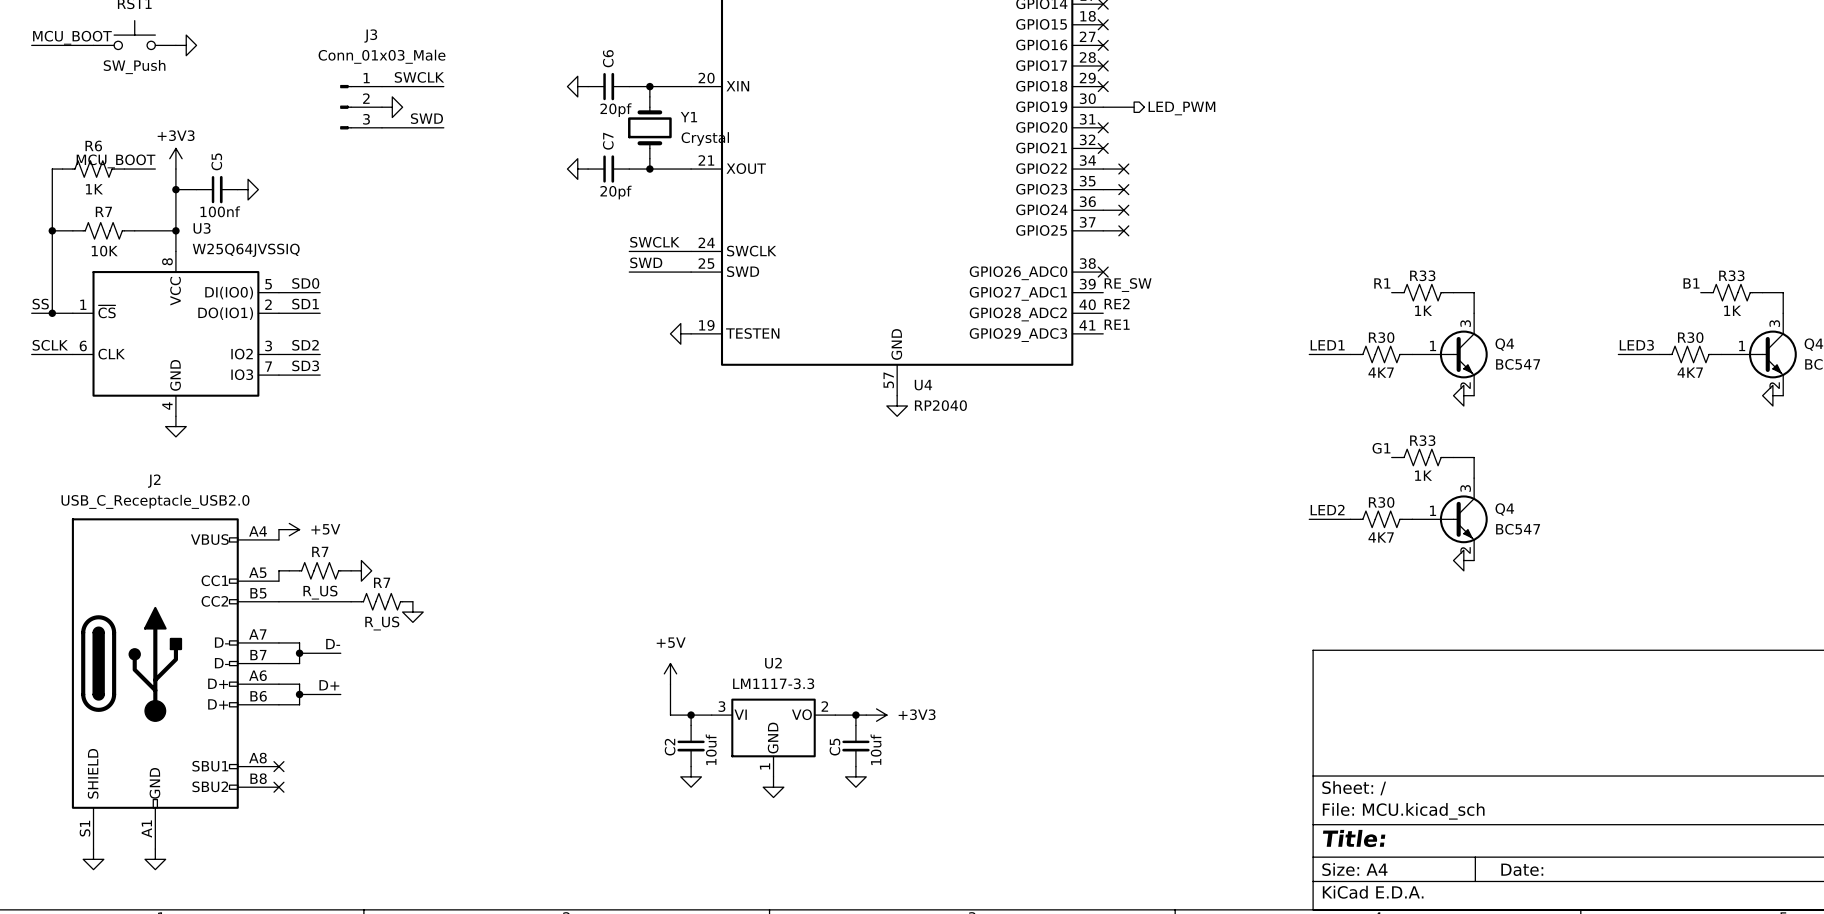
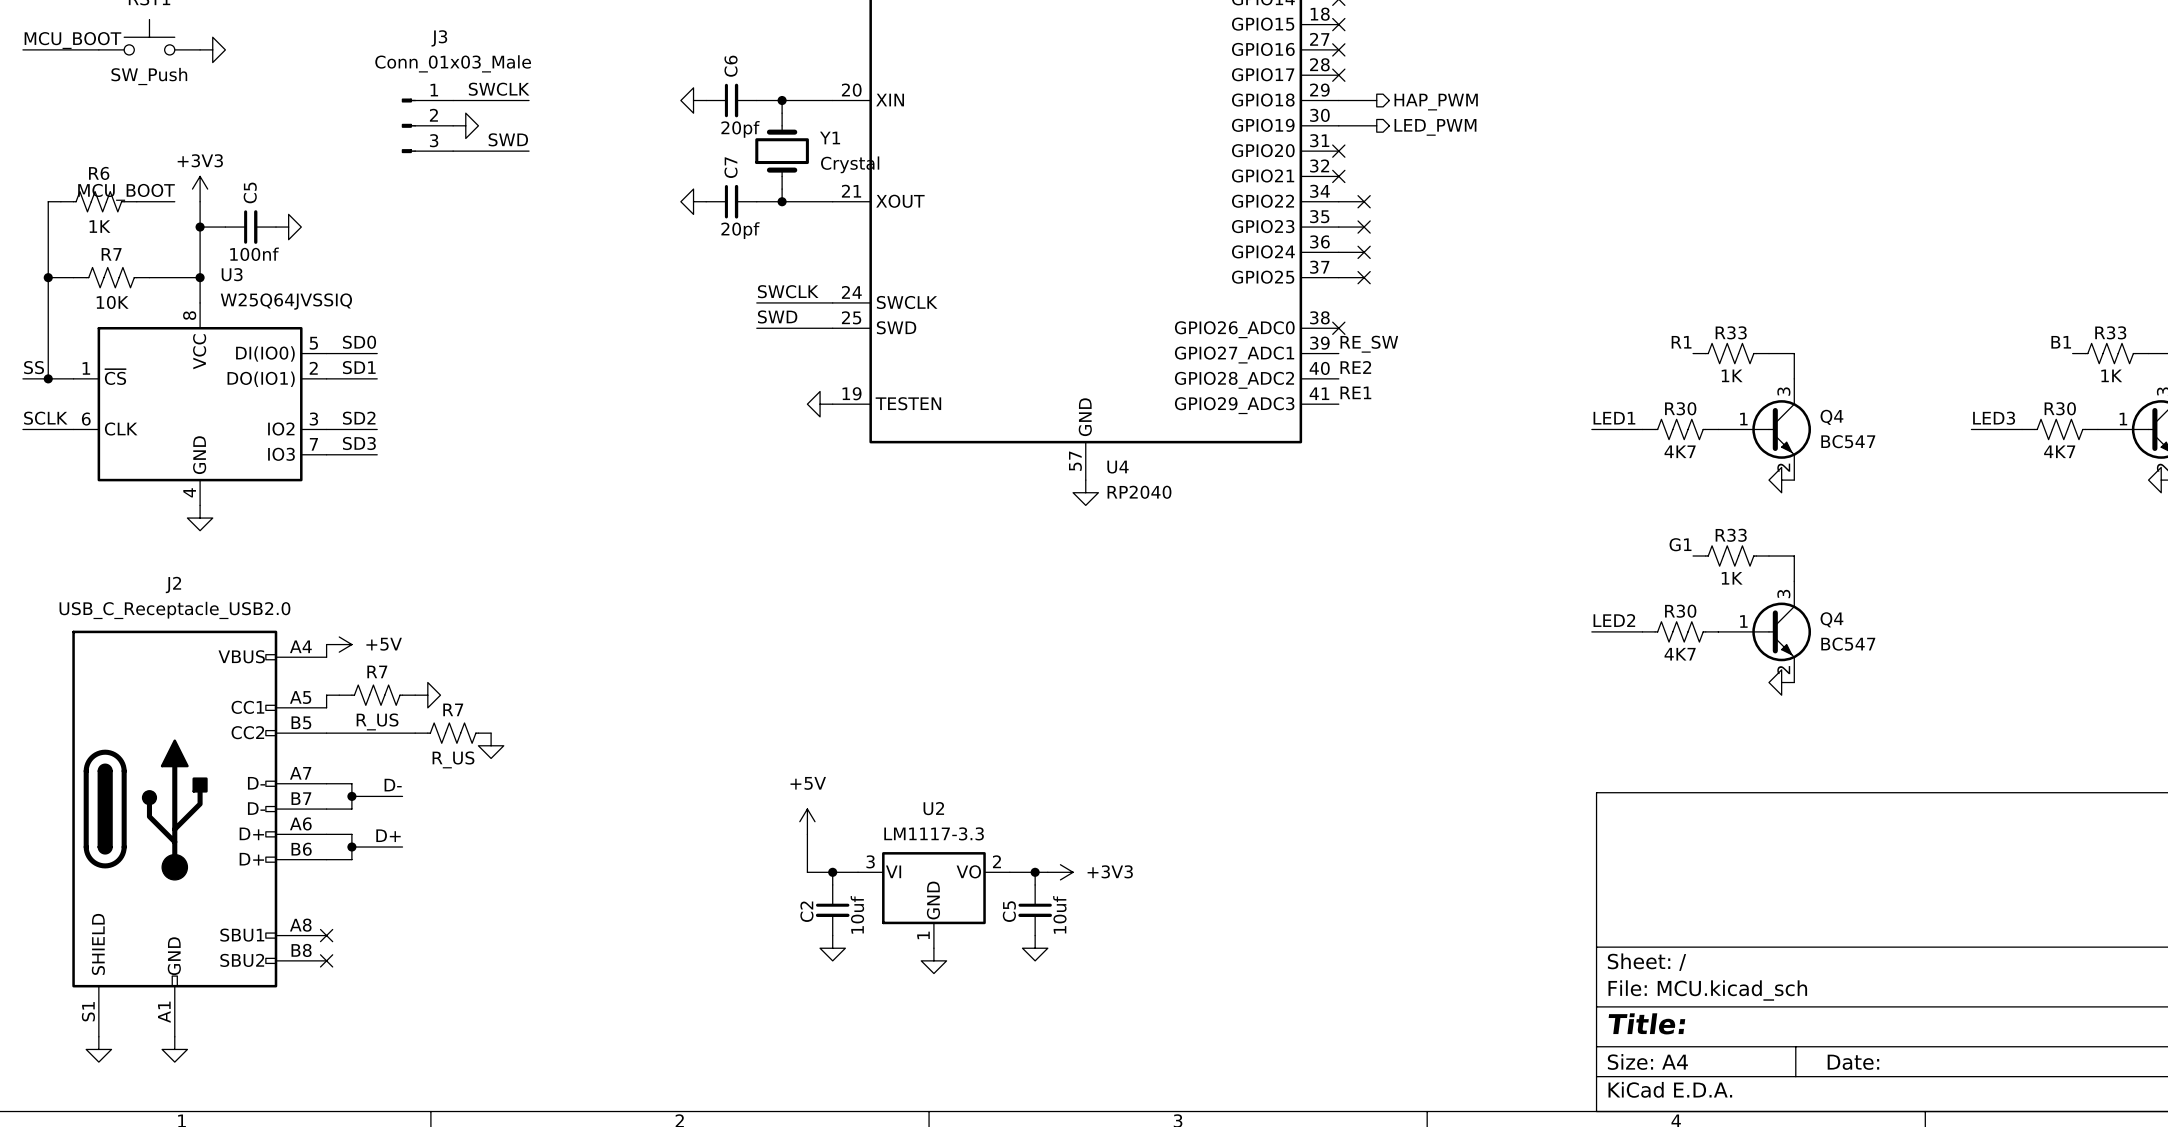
wire: none -> (1338, 100) (1376, 100)
no-connect mark: (1103, 86) -> none
hierarchical label: none -> HAP_PWM (1436, 102)

